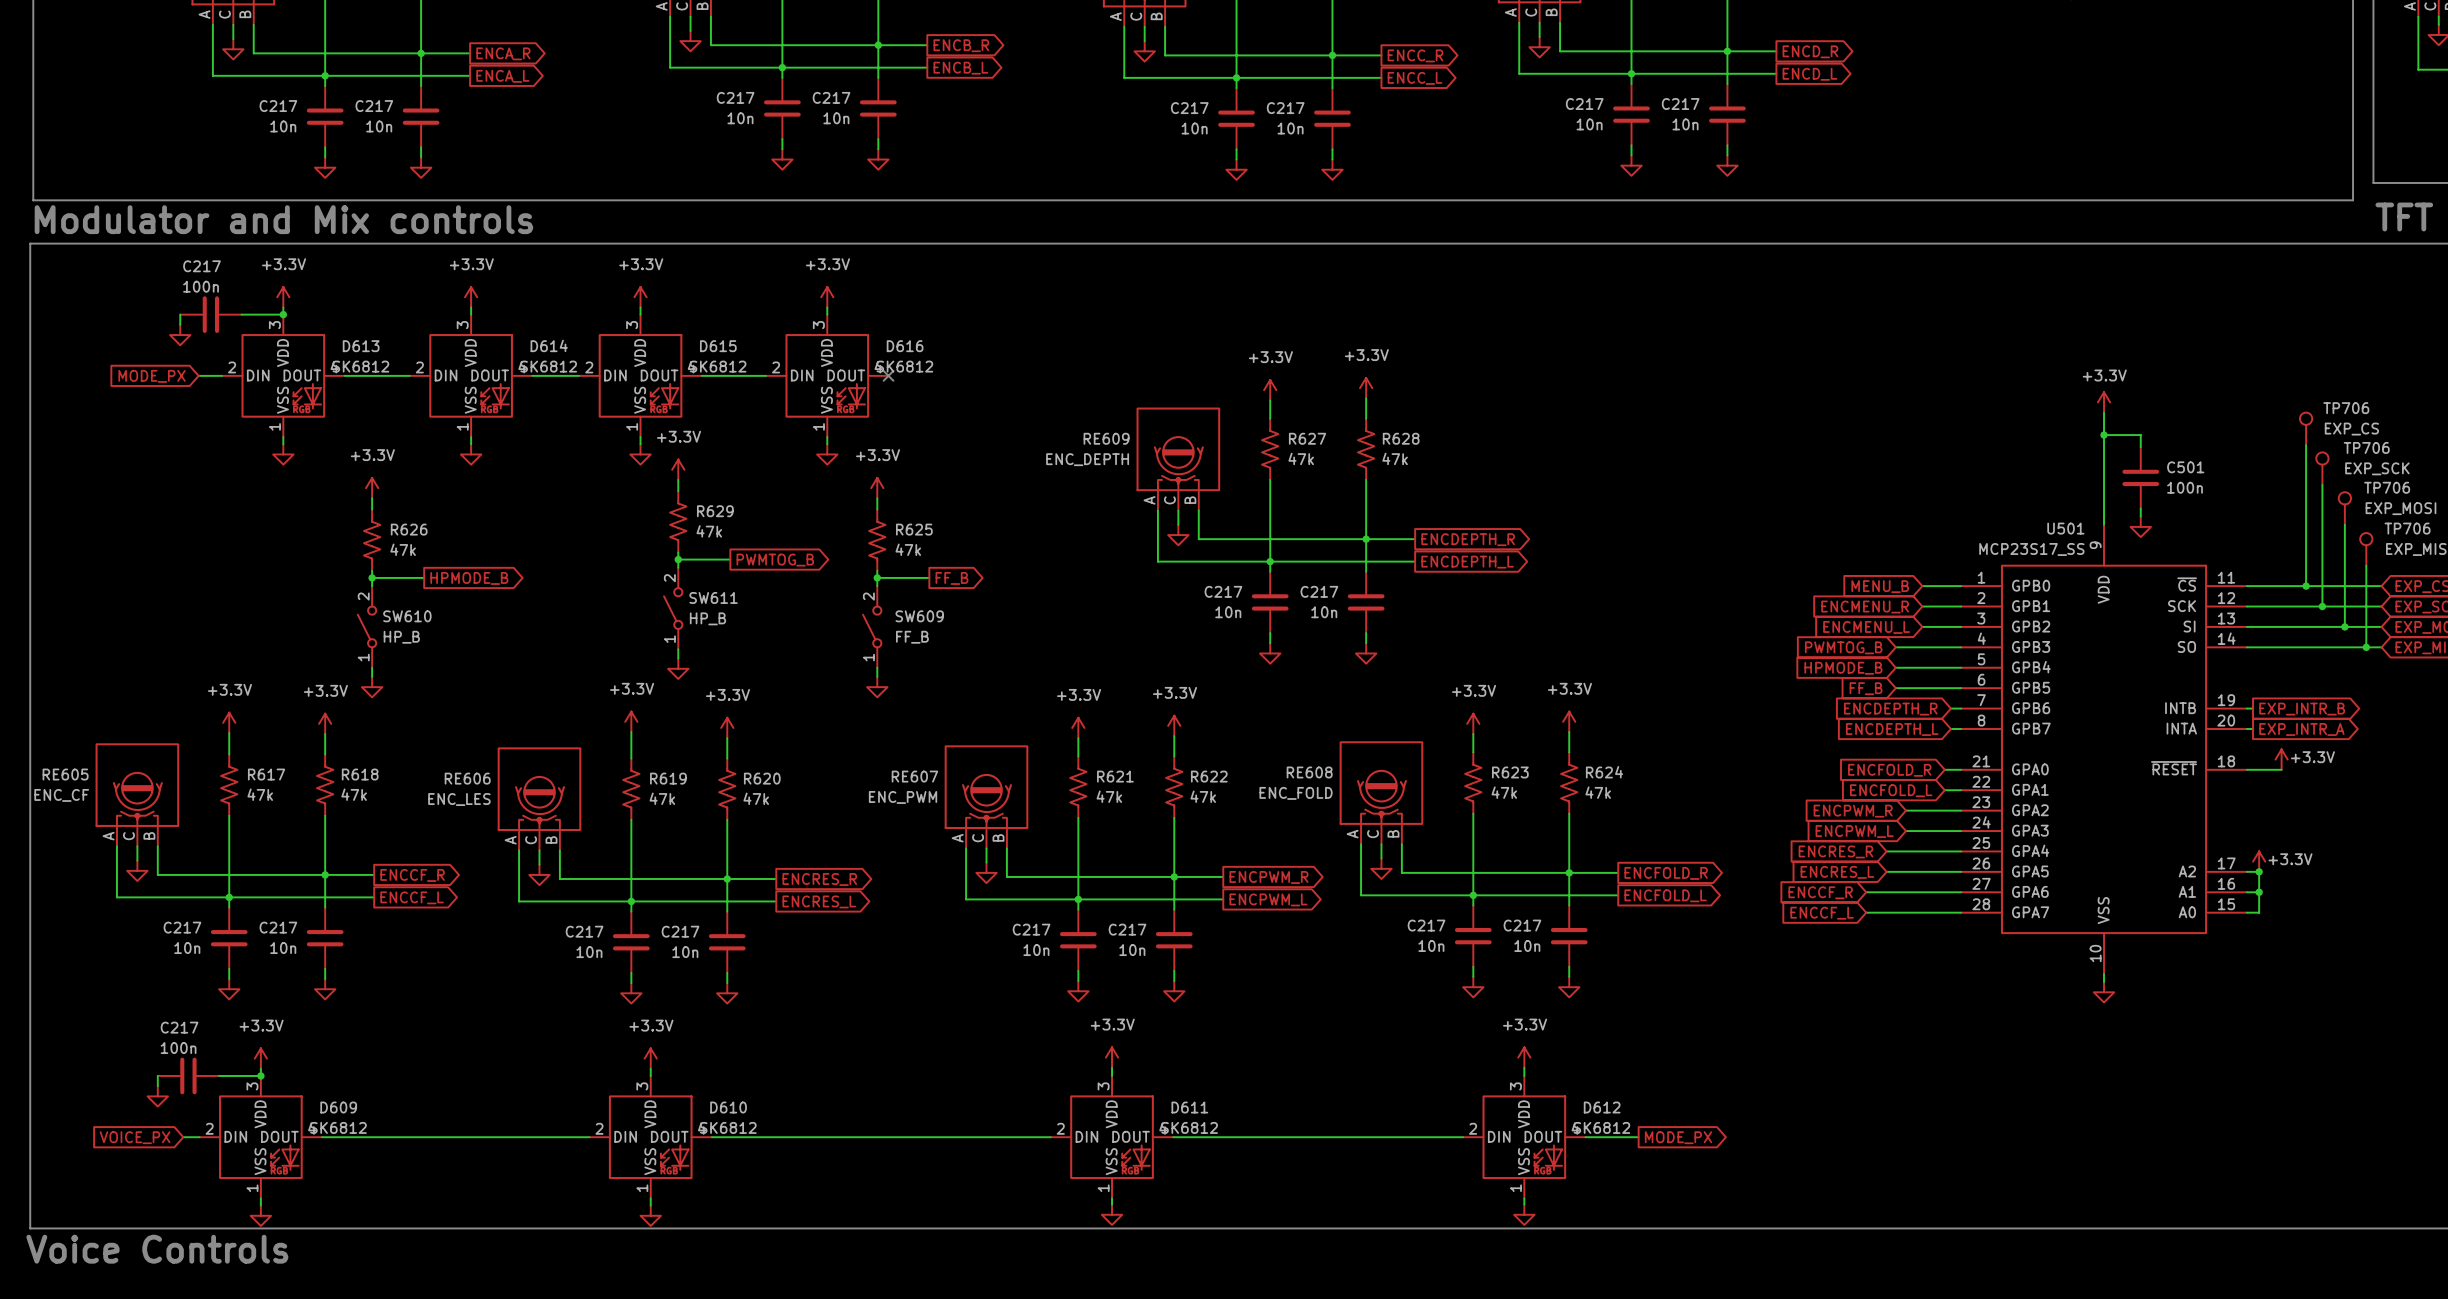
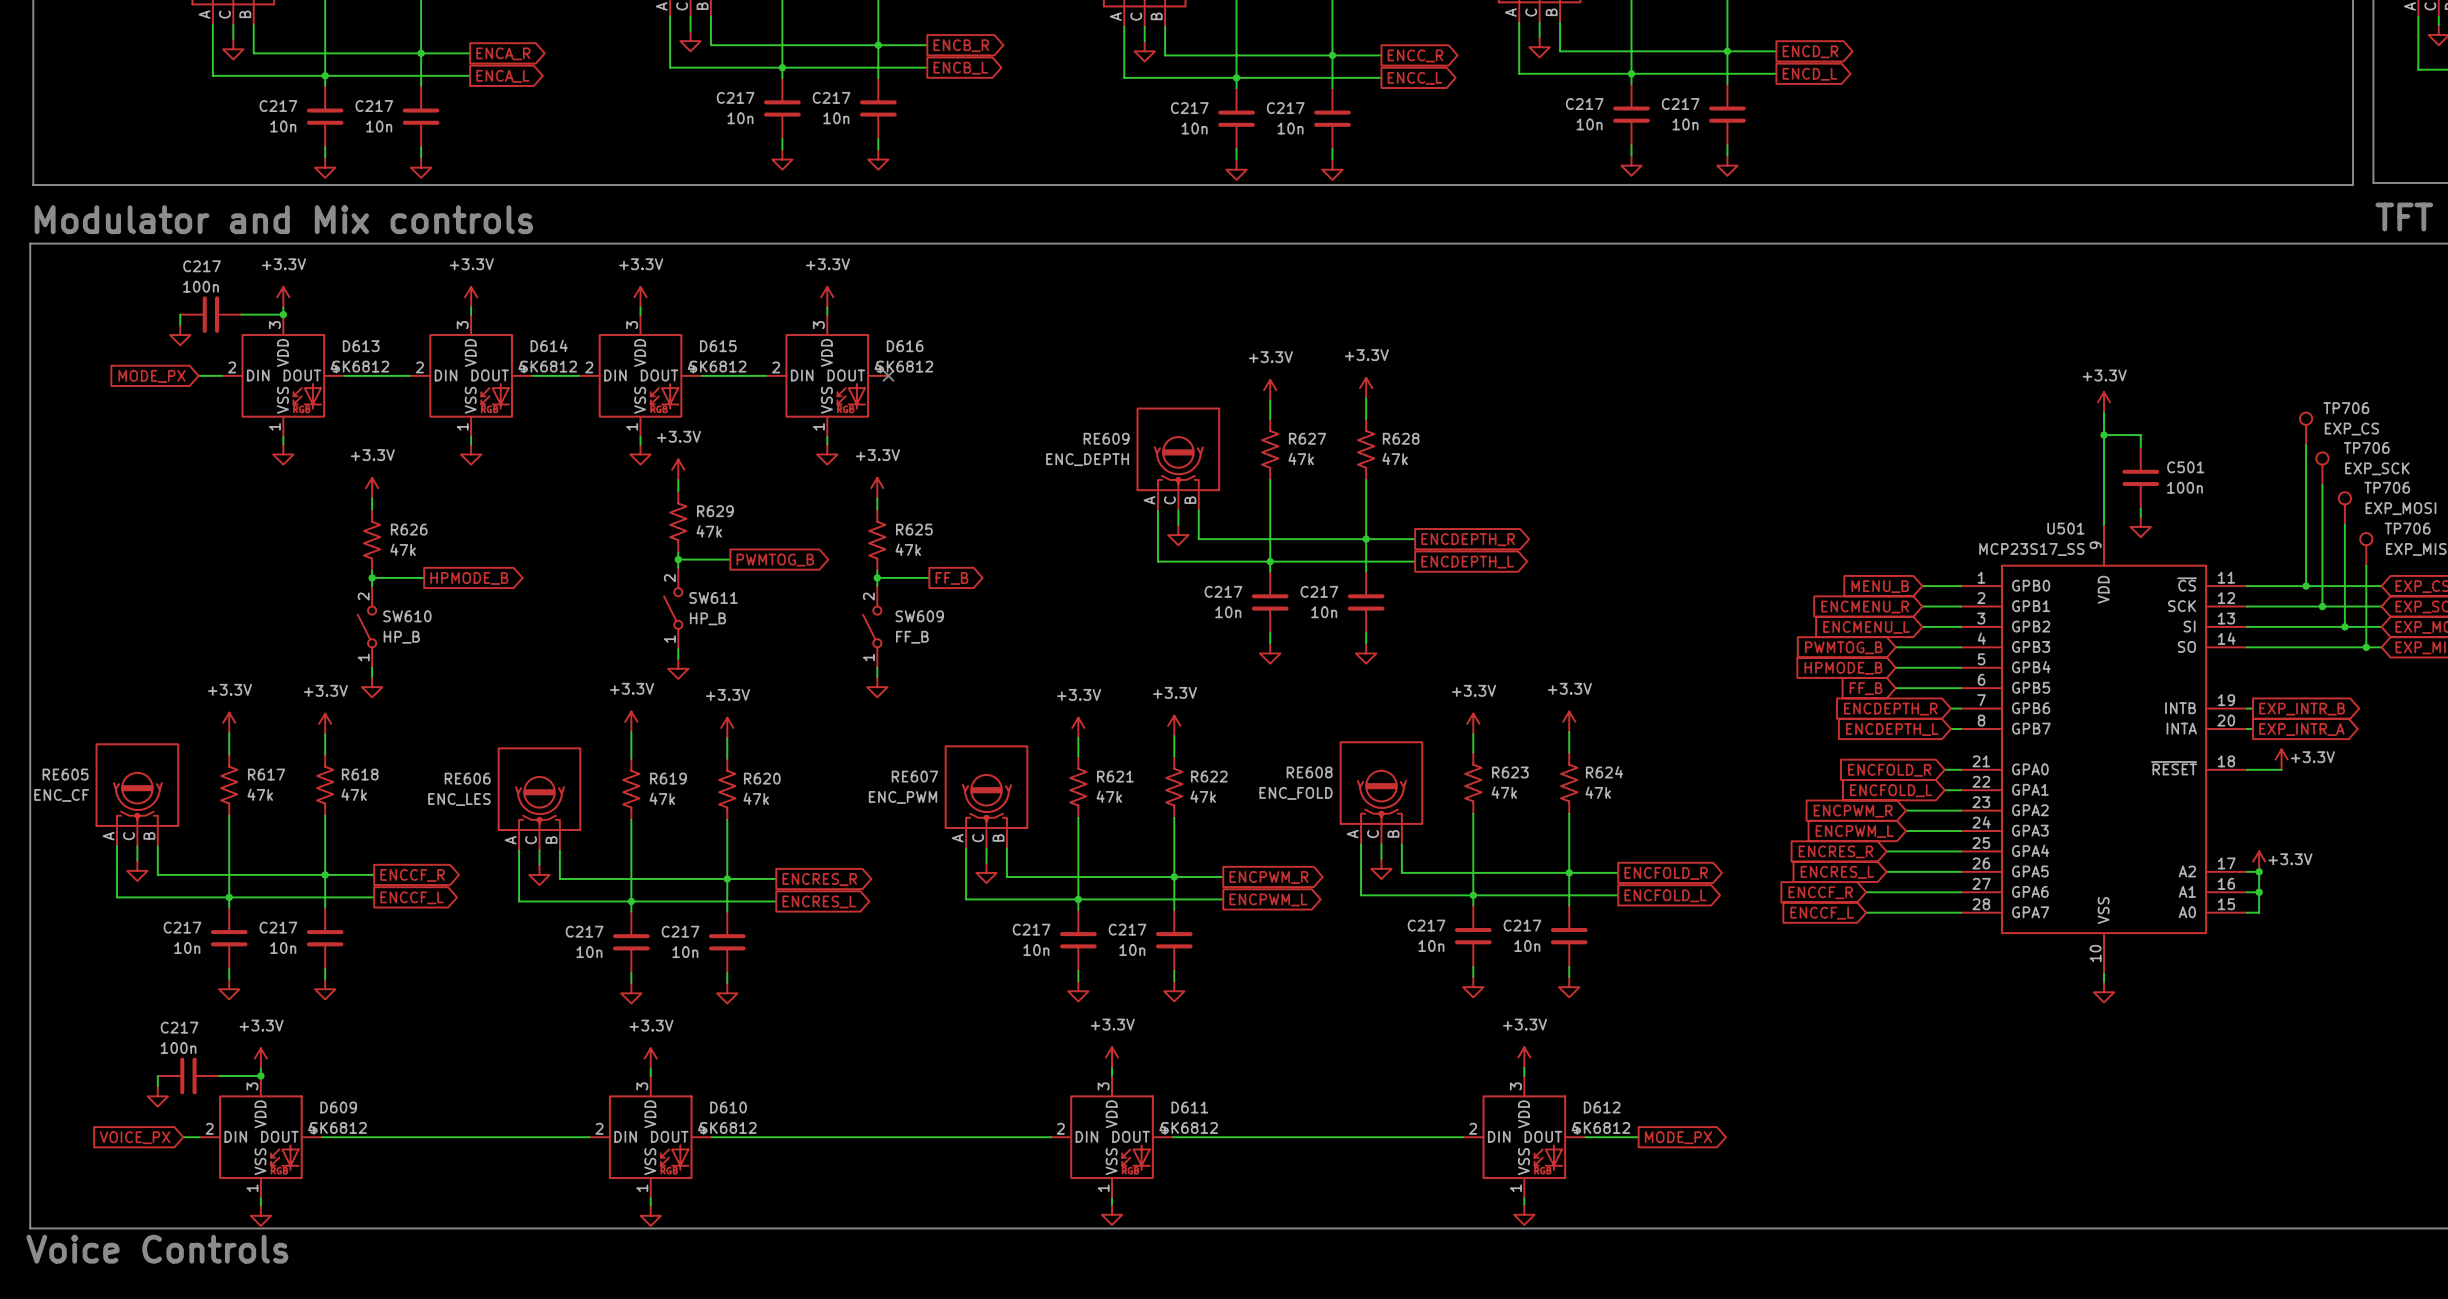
line: (33, 185) (33, 200) (2353, 200) (2353, 185) -> (33, 185) (2353, 185)

